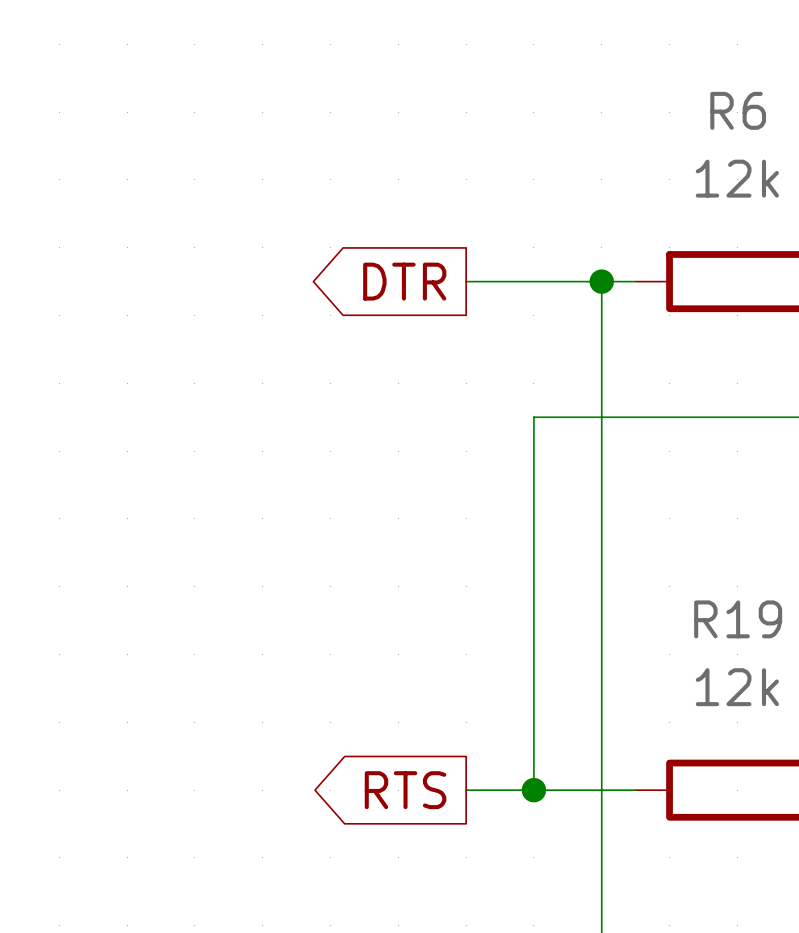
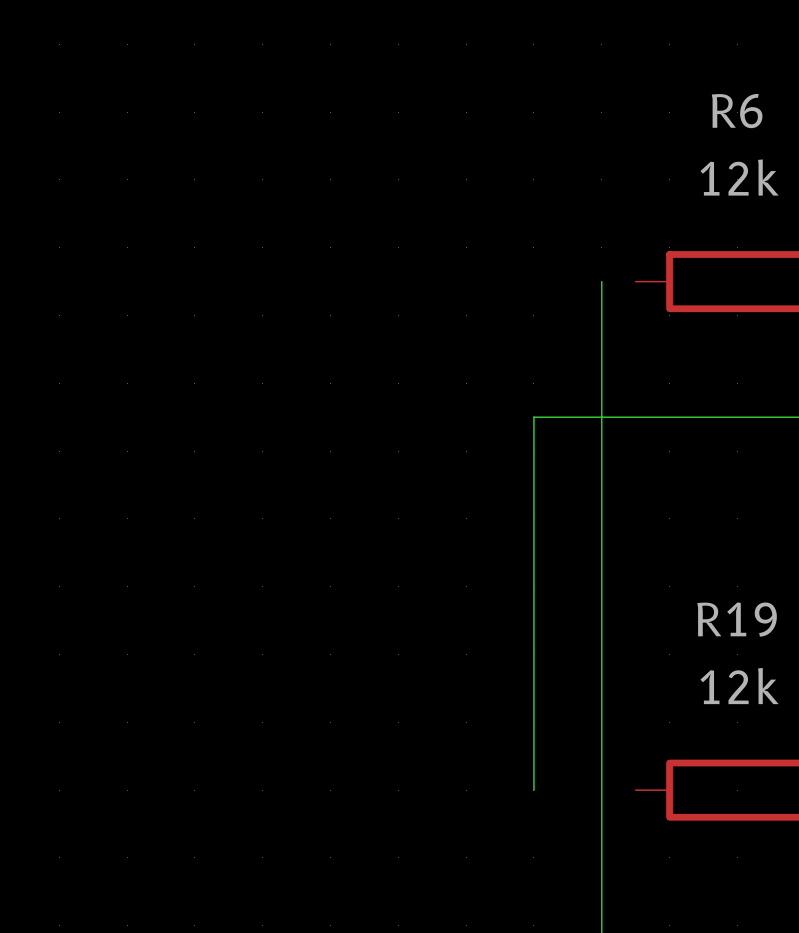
global label: DTR (404, 281) -> none
wire: (466, 281) (635, 281) -> none
junction: (601, 281) -> none
global label: RTS (405, 790) -> none
wire: (466, 790) (635, 790) -> none
junction: (533, 790) -> none

